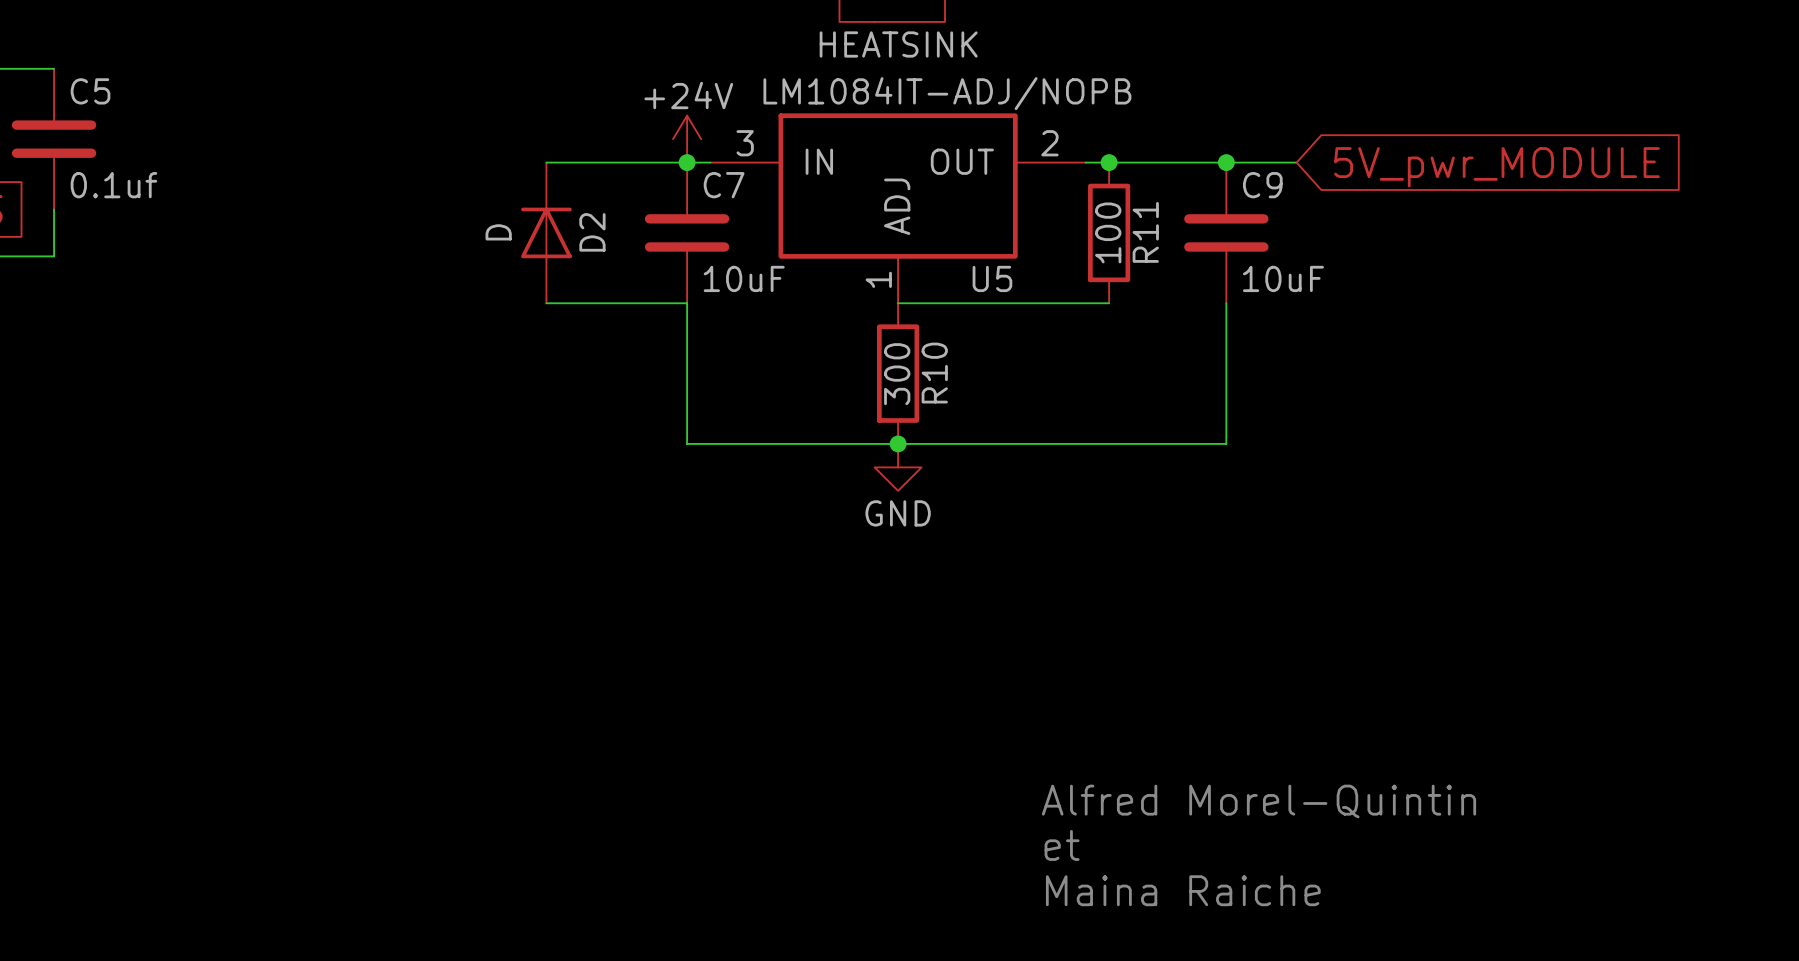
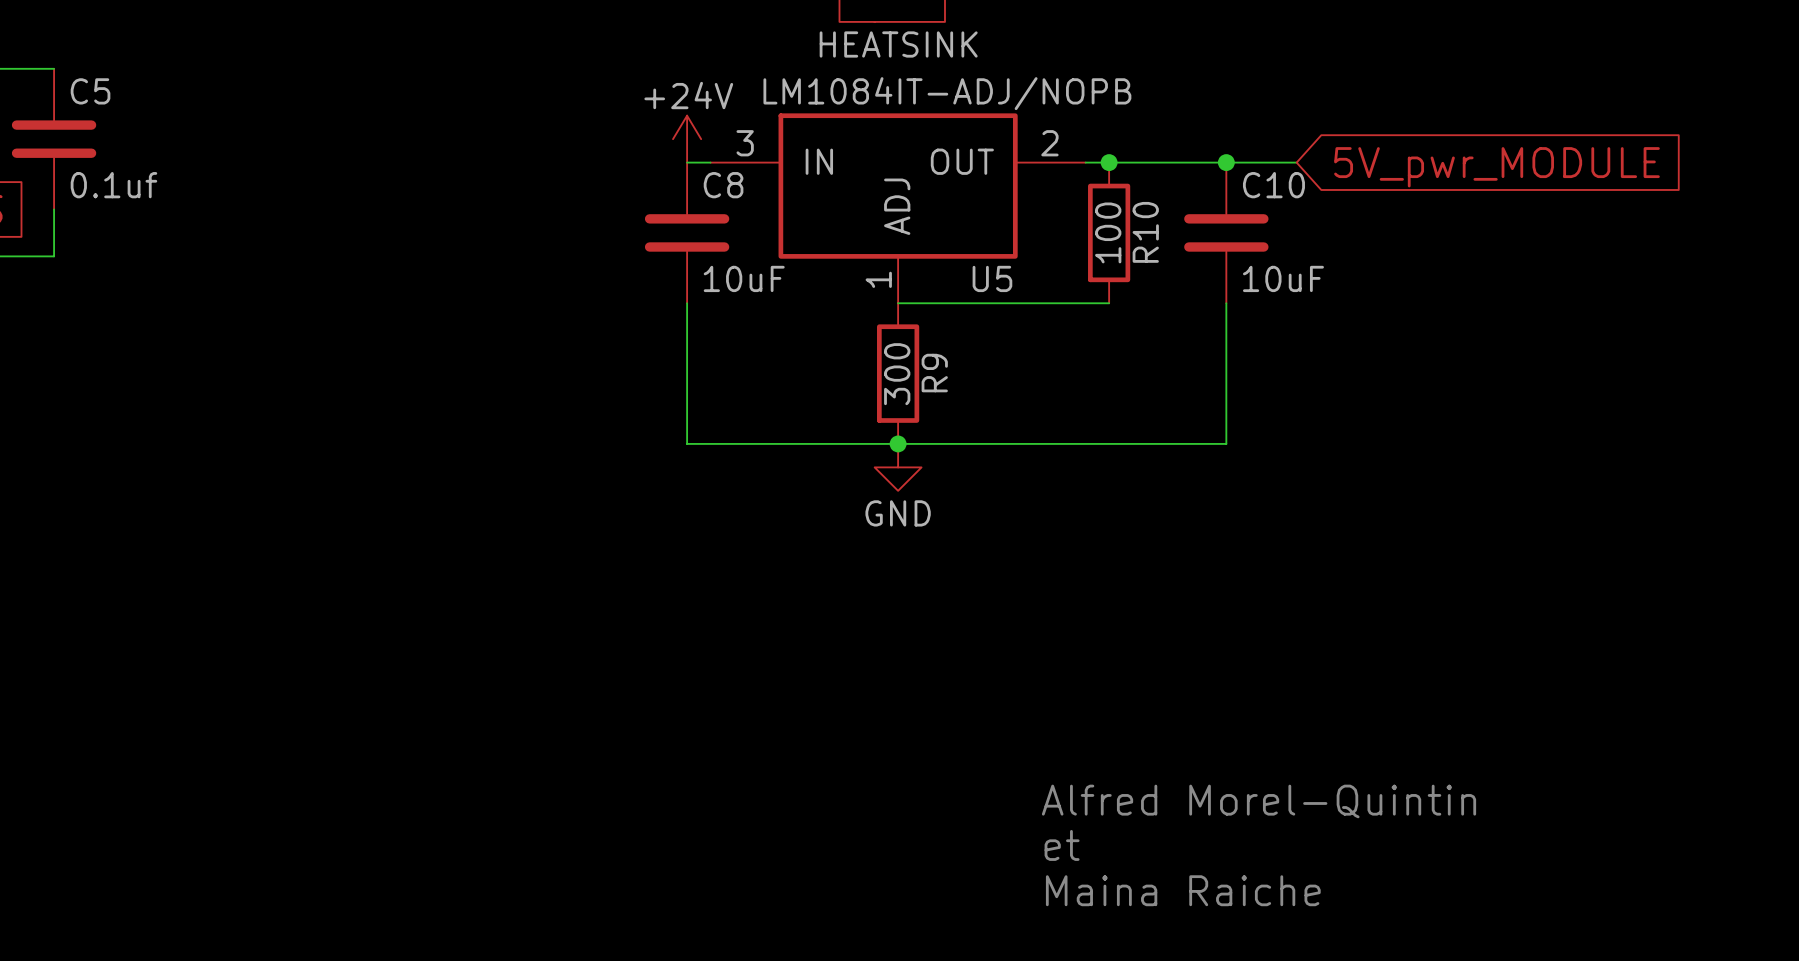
wire: (546, 162) (687, 162) -> none
junction: (687, 162) -> none
C7 name: C7 (724, 185) -> C8 (723, 185)
C9 name: C9 (1262, 185) -> C10 (1273, 185)
D2: D (546, 232) -> none
R11 name: R11 (1145, 232) -> R10 (1145, 232)
wire: (546, 303) (687, 303) -> none
R10 name: R10 (934, 373) -> R9 (934, 373)

